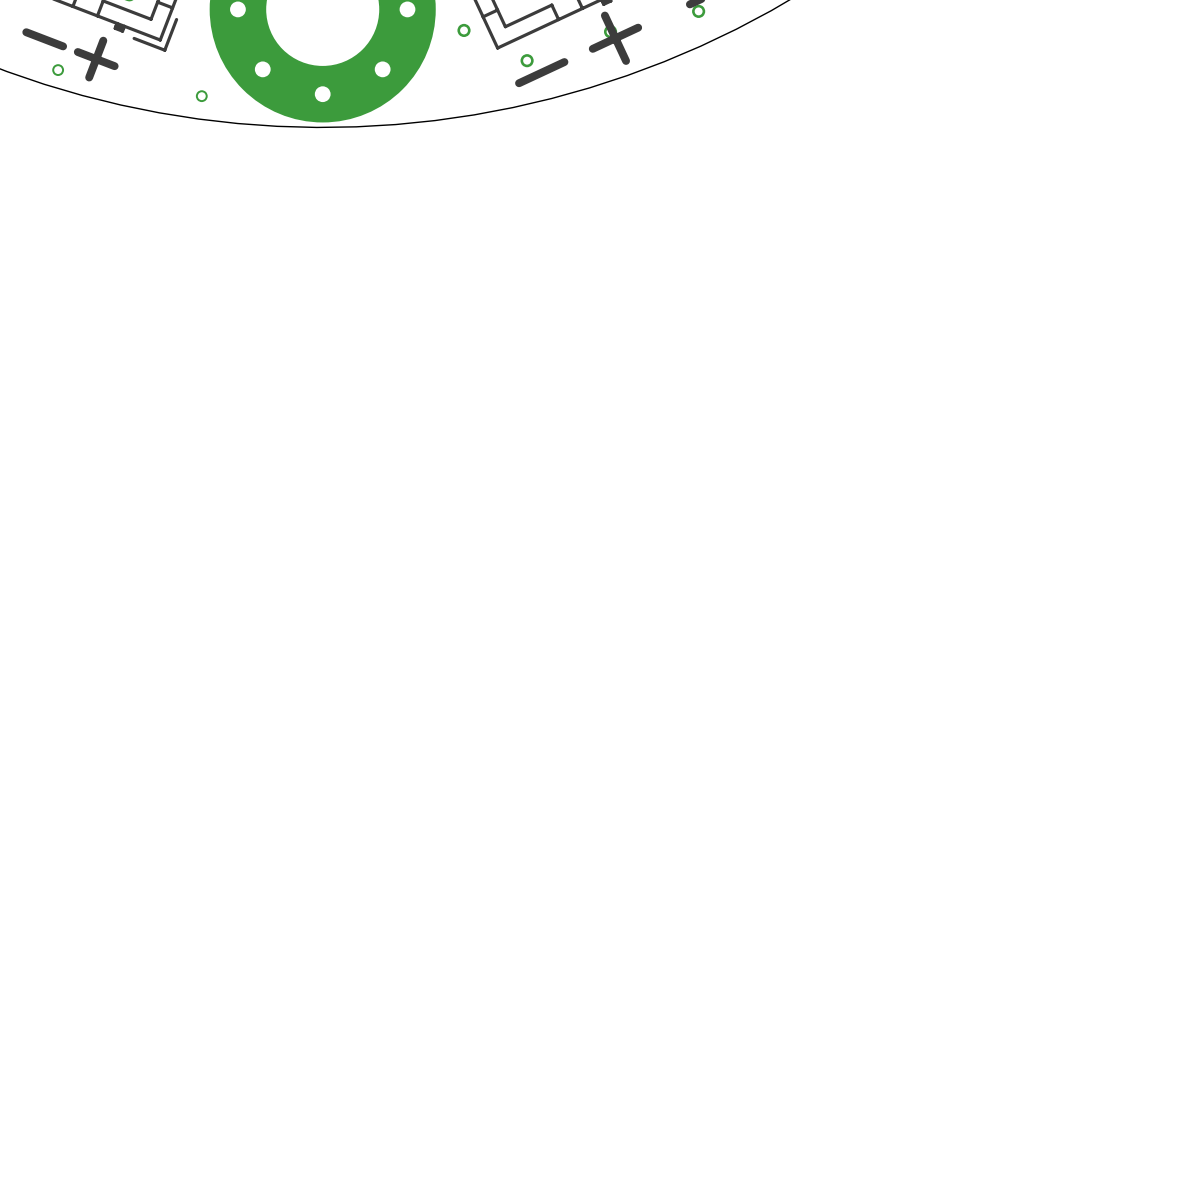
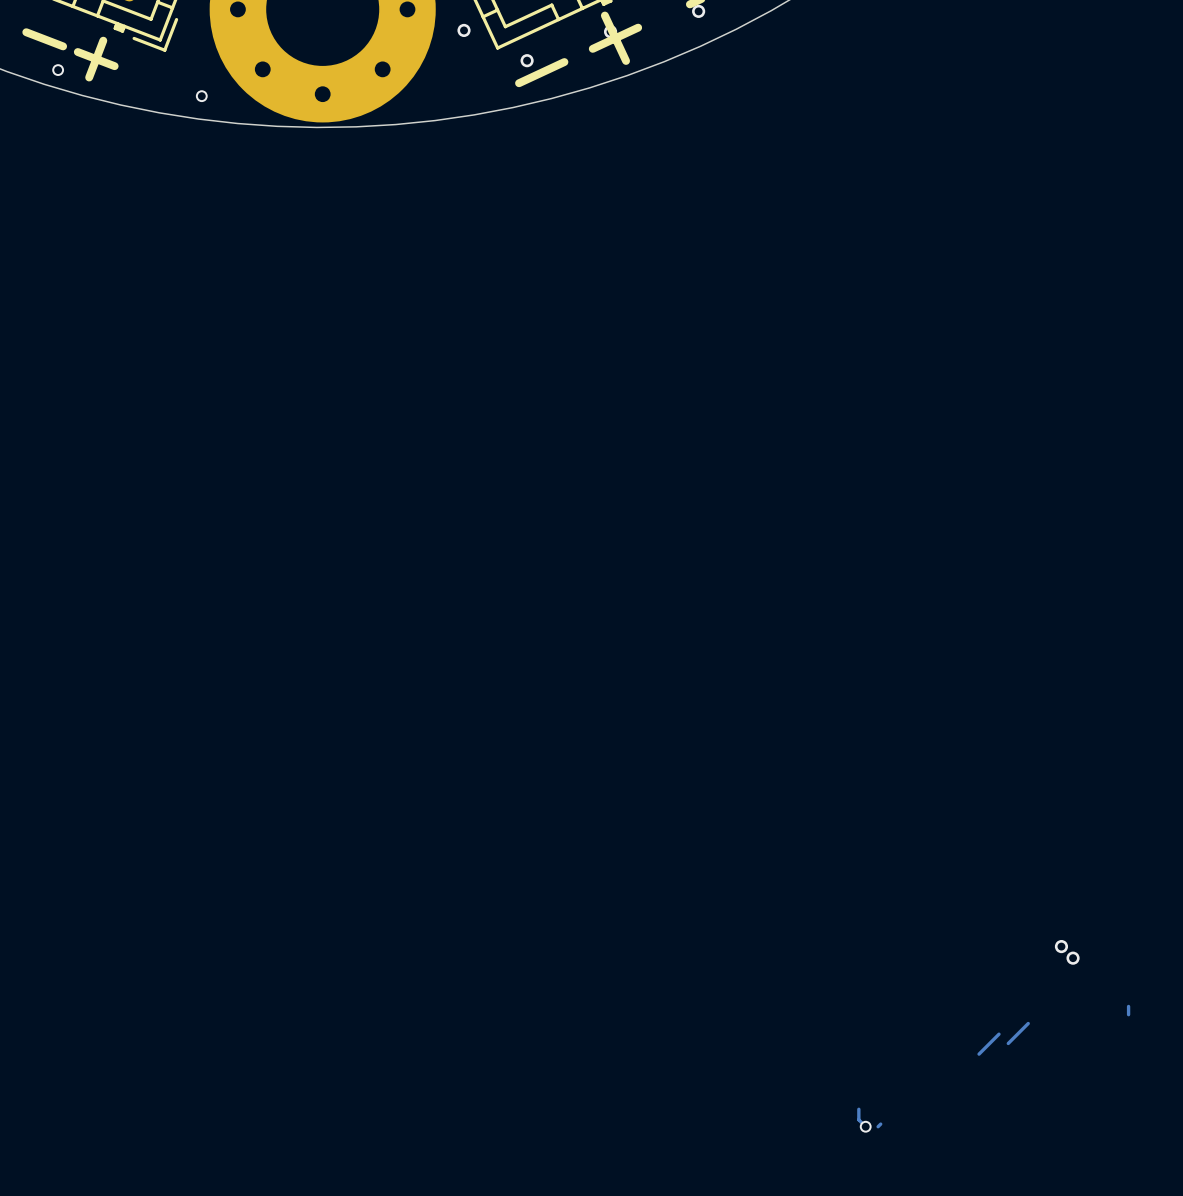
via: none -> (1061, 946)
via: none -> (1073, 958)
bottom track: none -> (1128, 1006) (1128, 1014)
bottom track: none -> (1028, 1023) (1008, 1043)
bottom track: none -> (999, 1034) (979, 1054)
bottom track: none -> (858, 1109) (858, 1119) (865, 1126)
bottom track: none -> (880, 1124) (878, 1126)
via: none -> (865, 1126)

